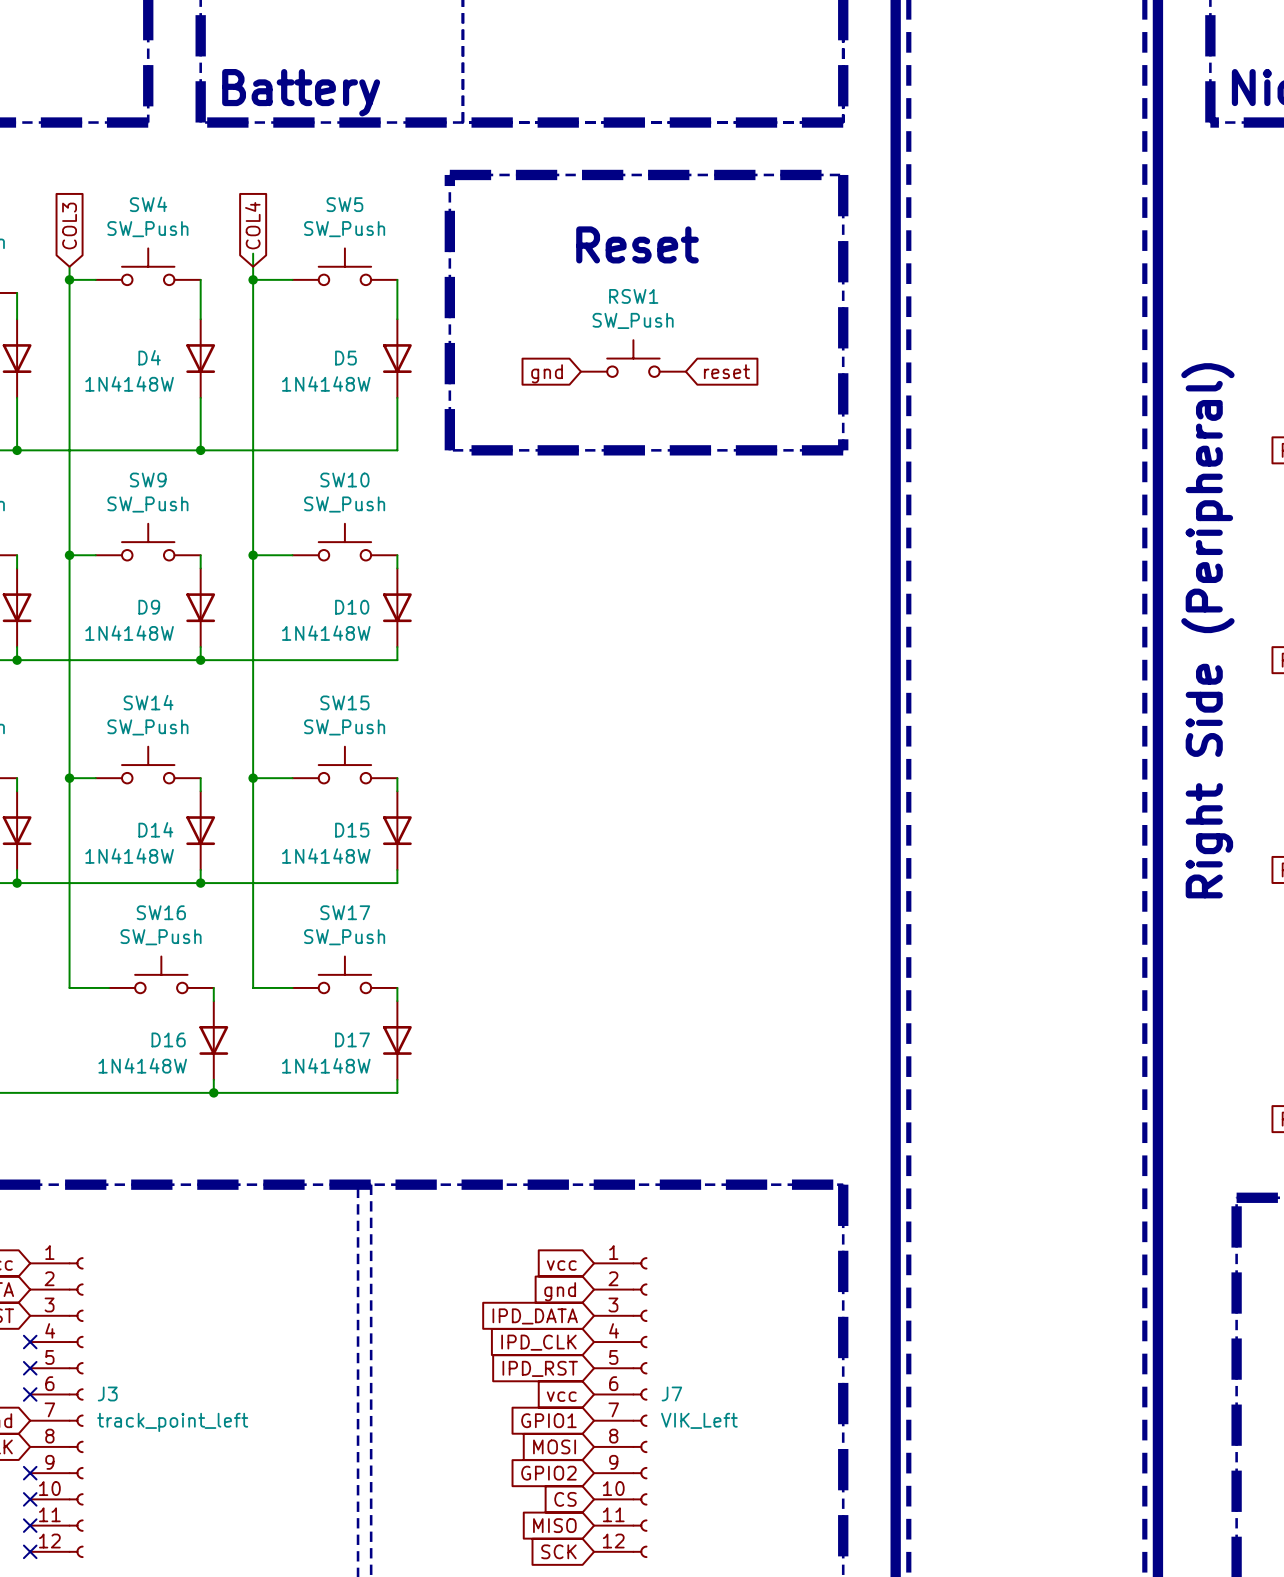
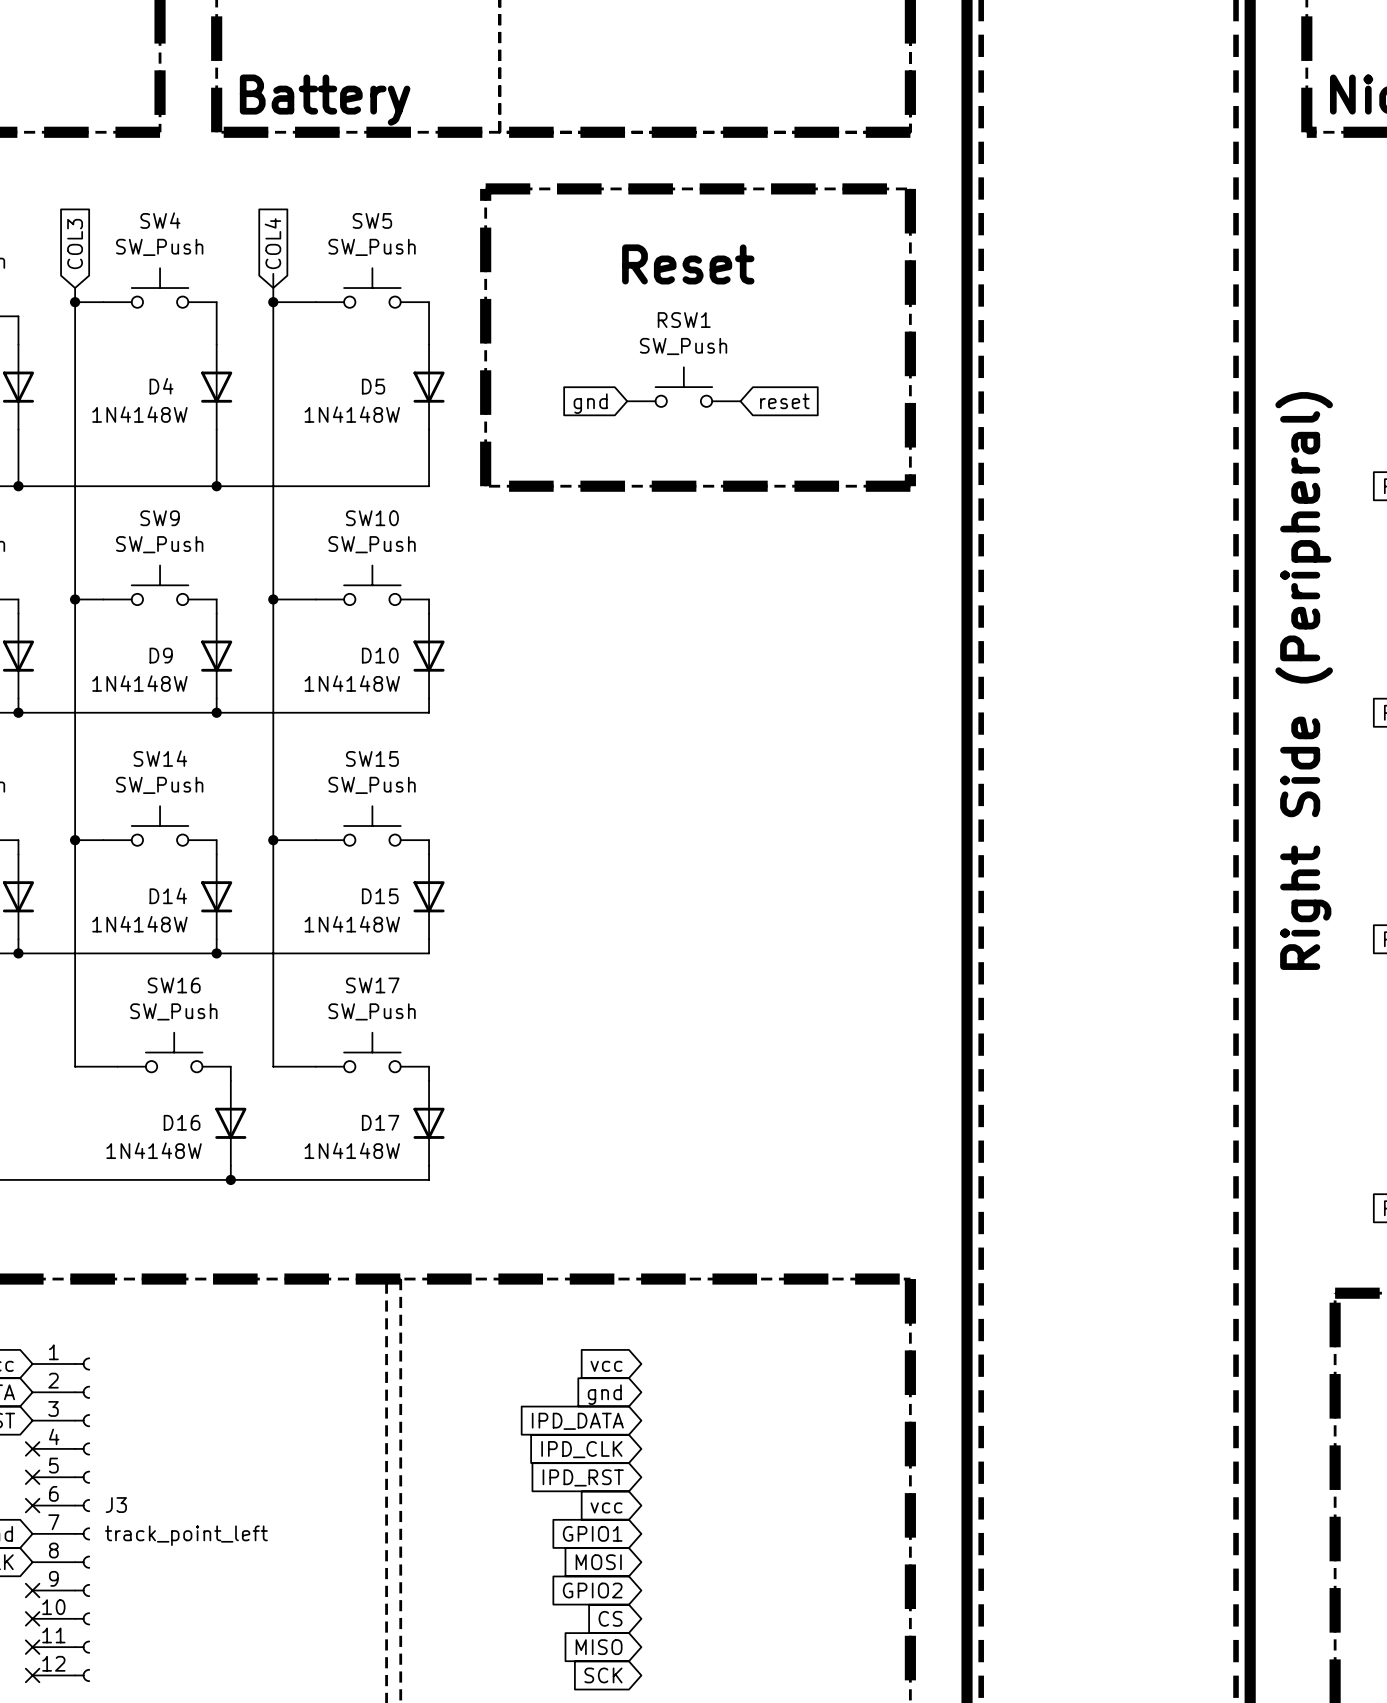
J7: VIK_Left (620, 1407) -> none

